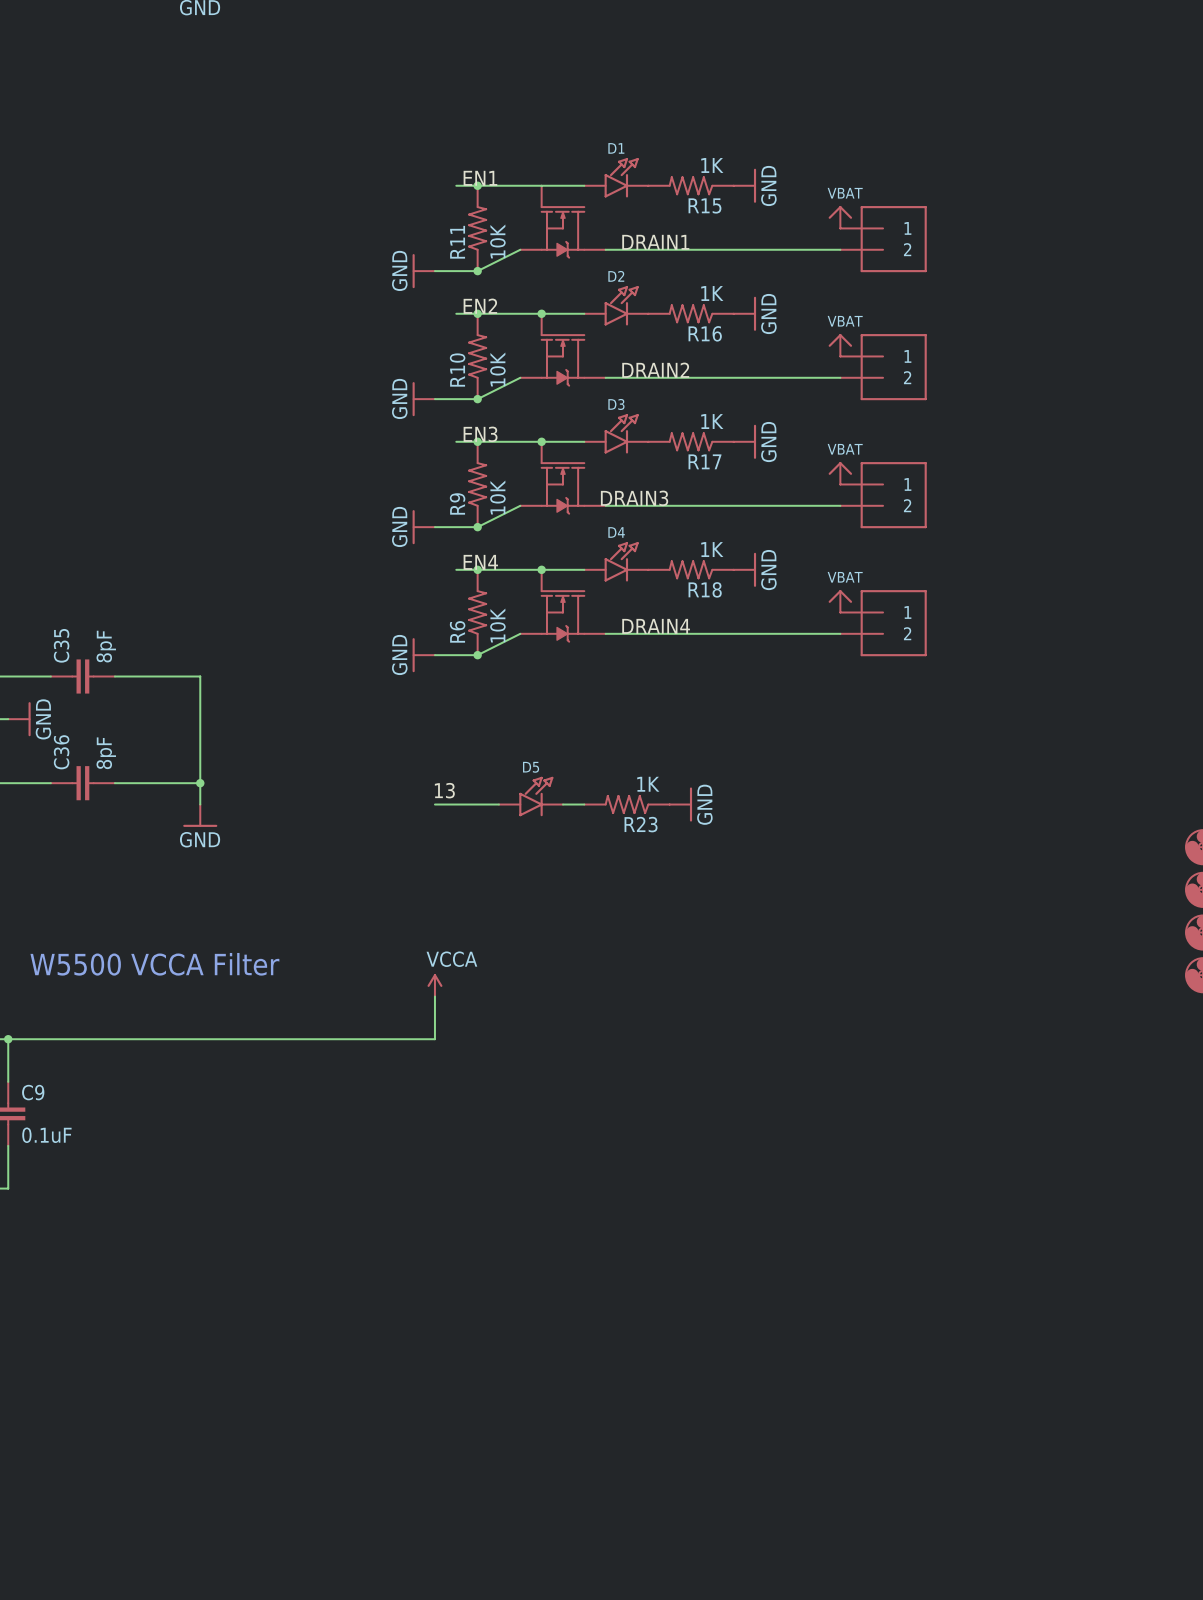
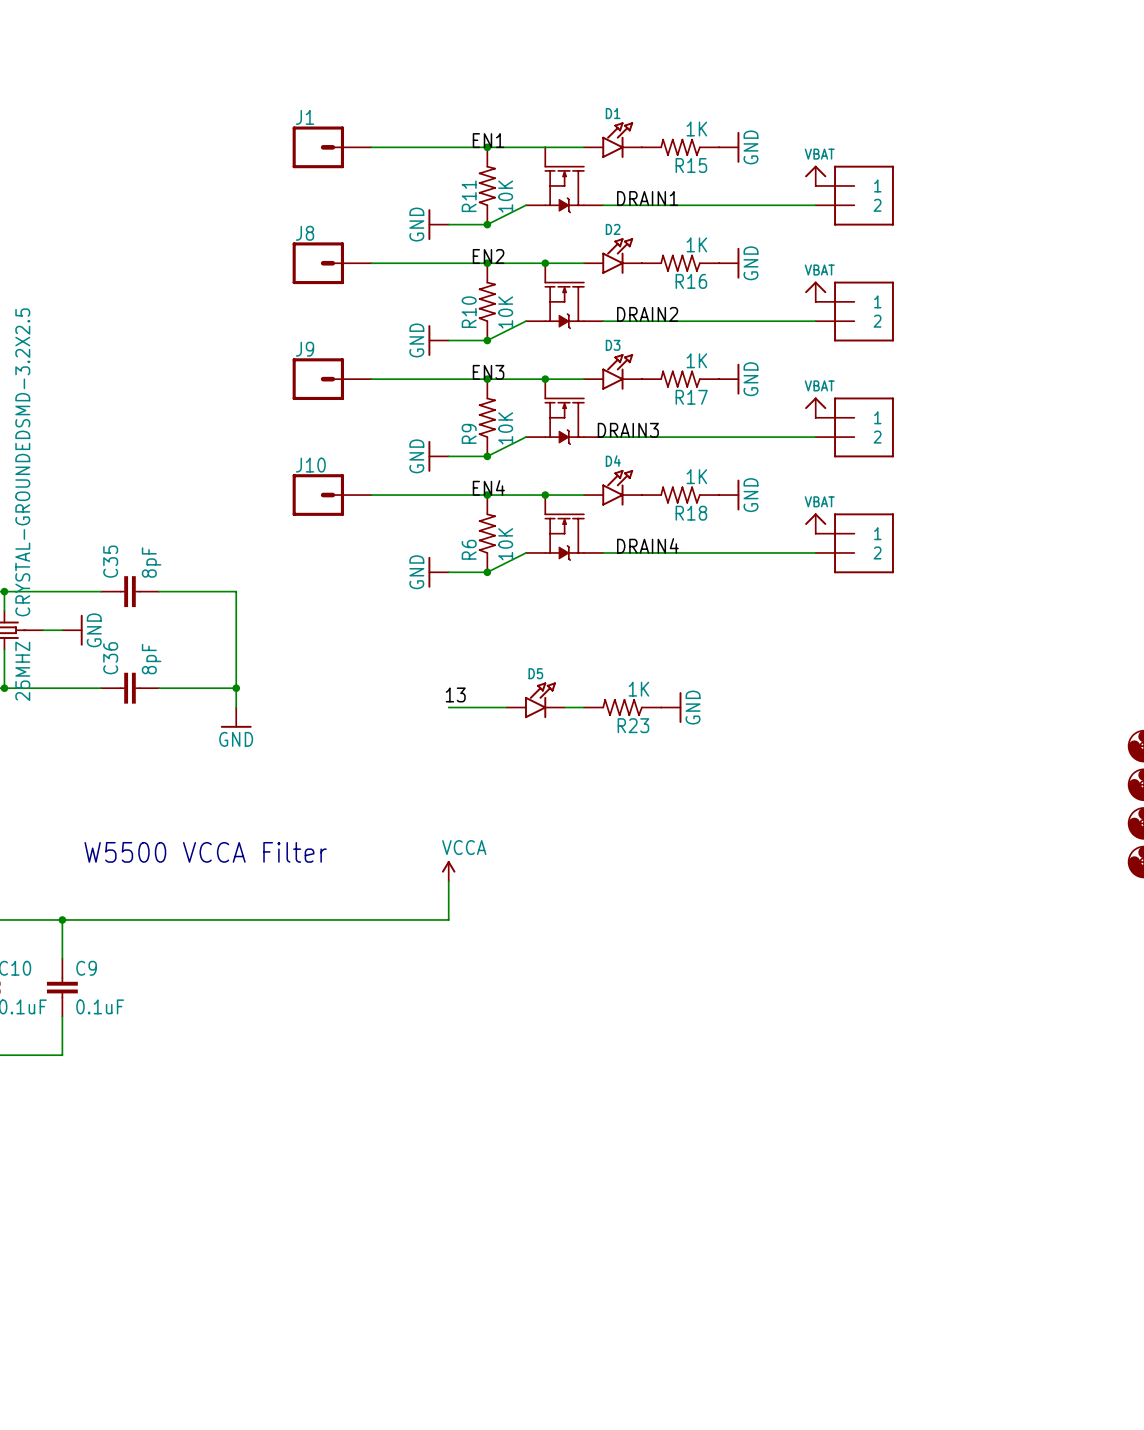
J1: none -> (332, 147)
wire: none -> (371, 147) (468, 147)
J8: none -> (332, 263)
wire: none -> (371, 263) (468, 263)
J9: none -> (332, 379)
wire: none -> (371, 379) (468, 379)
J10: none -> (332, 495)
wire: none -> (371, 495) (468, 495)

